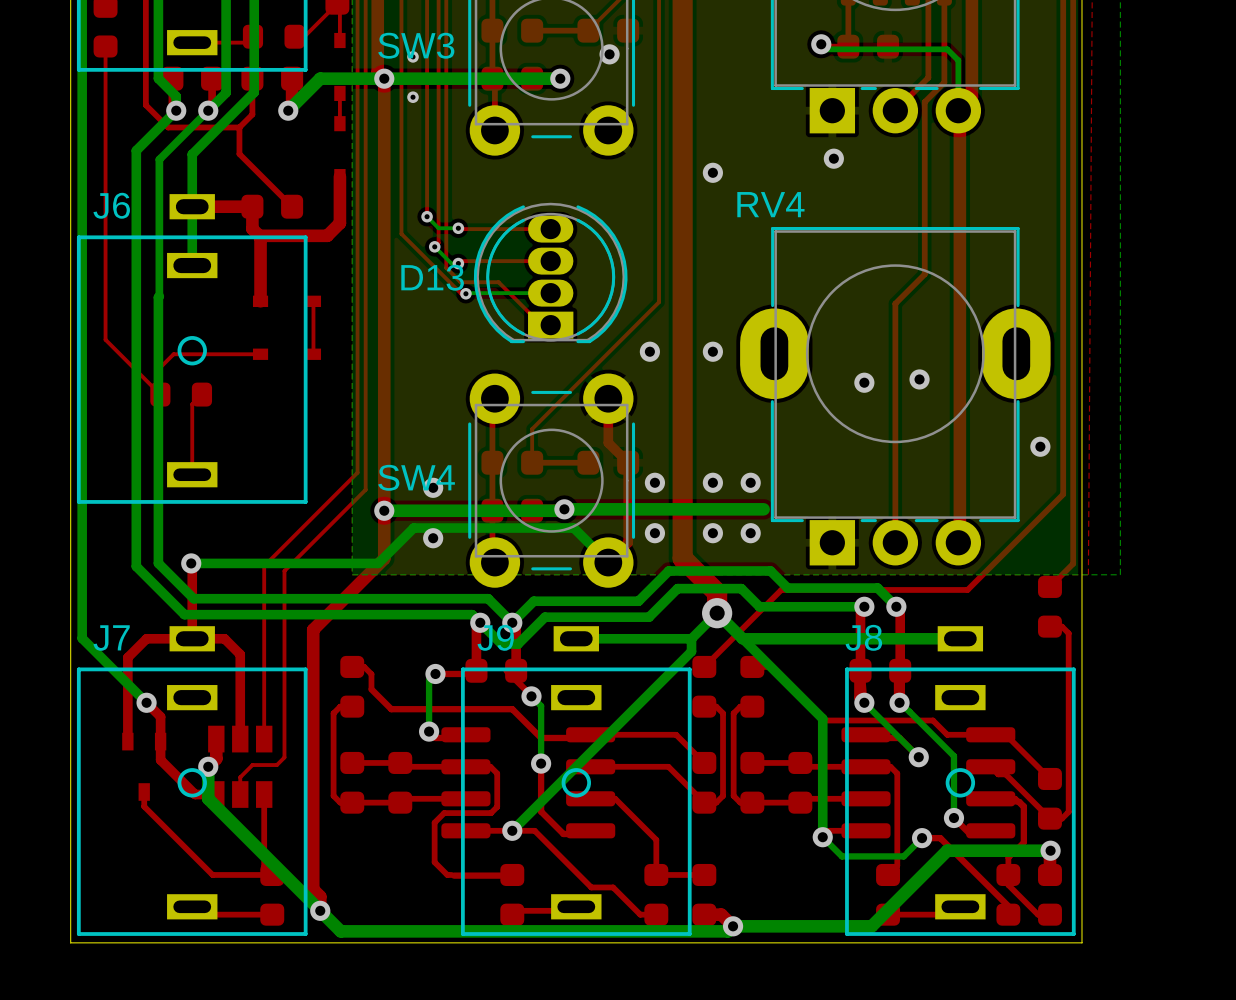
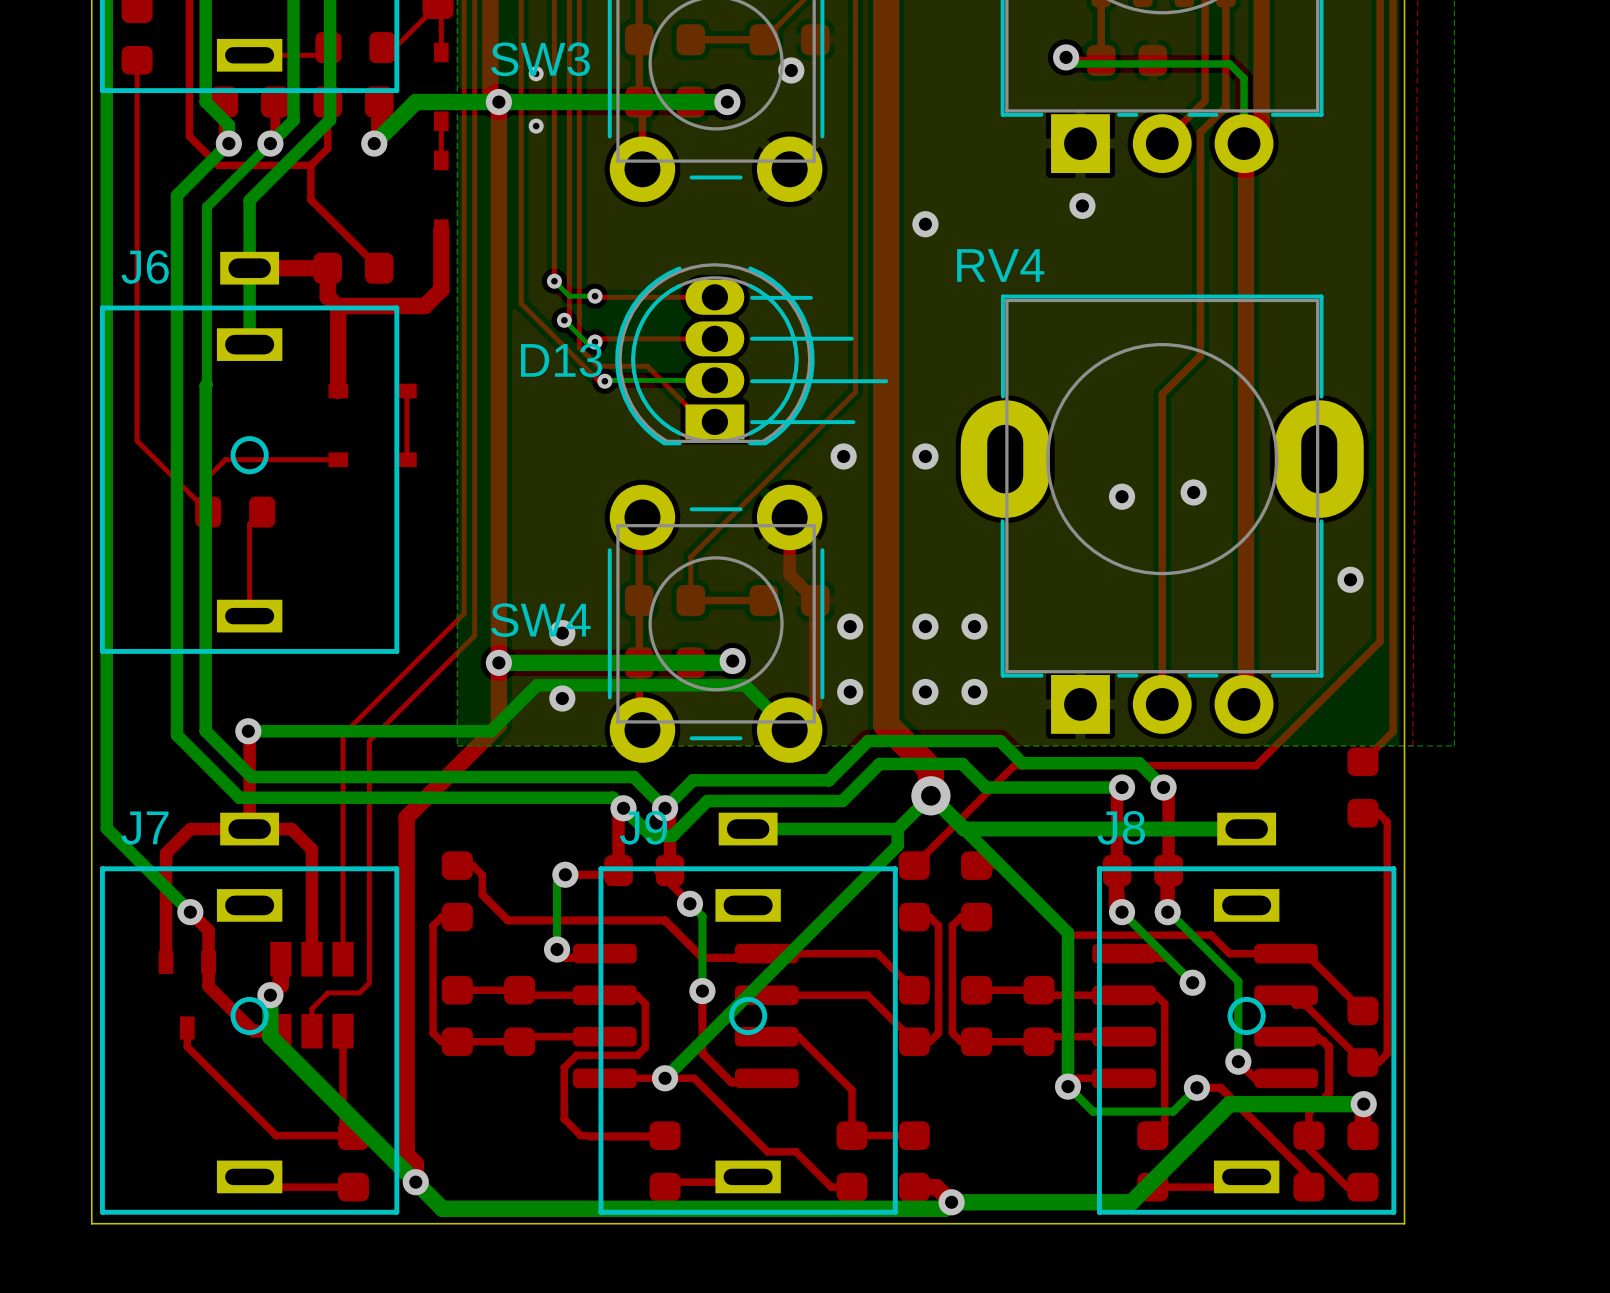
line: none -> (810, 297) (752, 297)
line: none -> (851, 338) (752, 338)
line: none -> (886, 381) (752, 381)
line: none -> (853, 422) (752, 422)
bottom track: (763, 509) (564, 509) -> none

